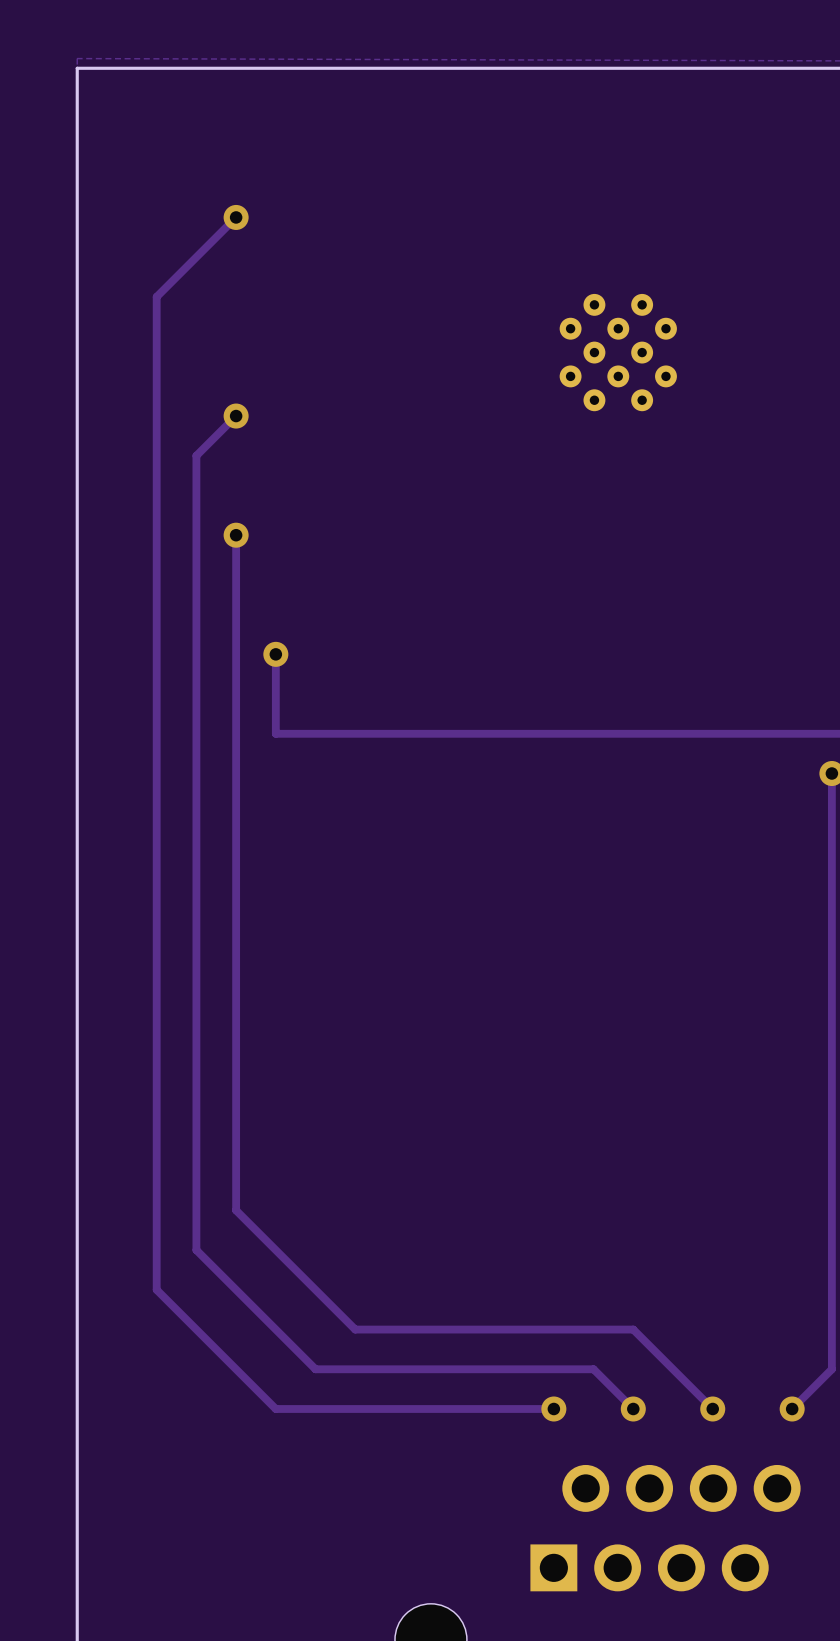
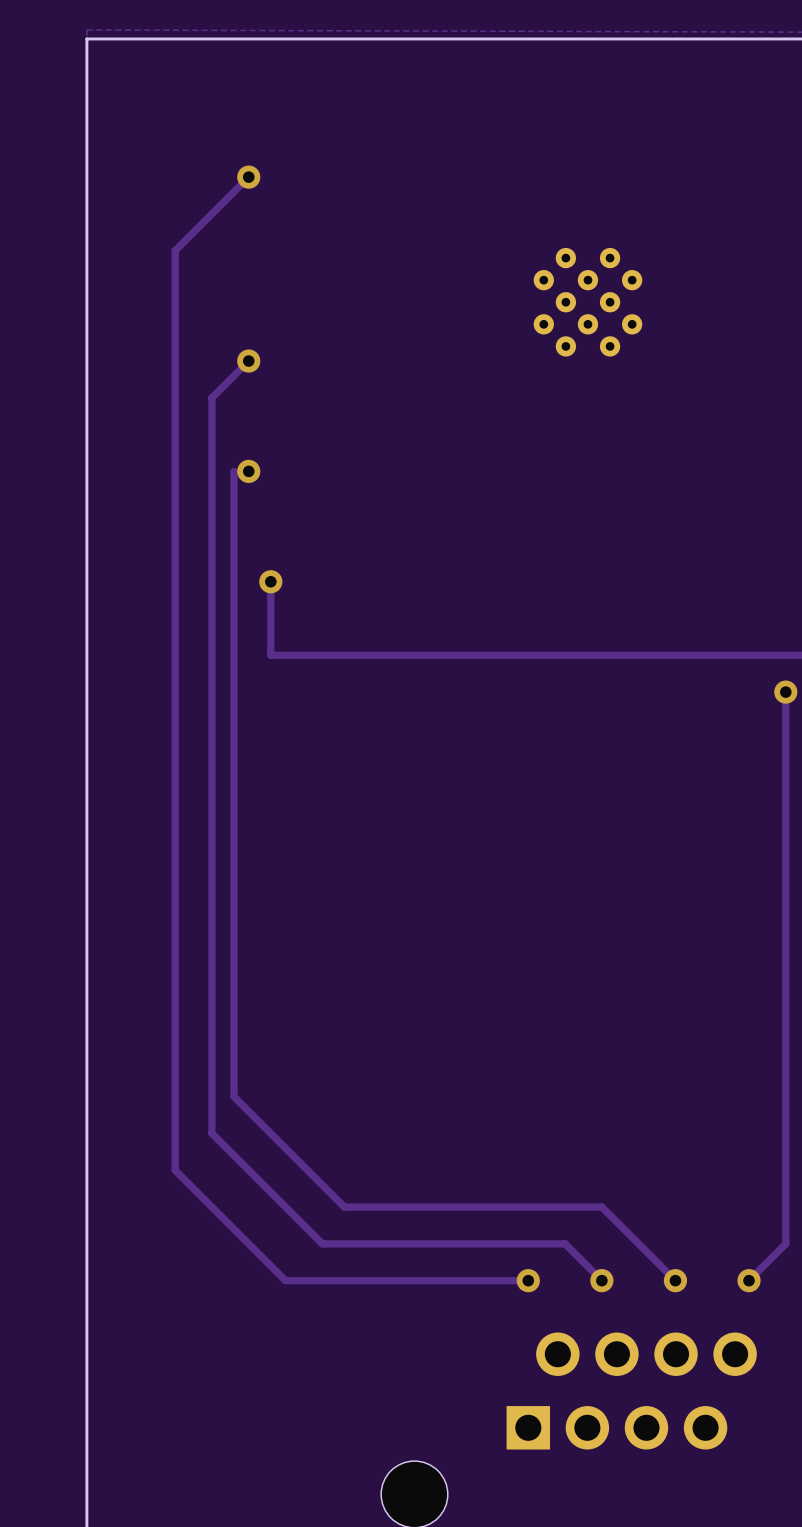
track: (236, 217) (156, 296) (156, 1289) (275, 1408) (291, 1408) -> (248, 177) (175, 250) (175, 1170) (285, 1280)
via position: (236, 217) -> (248, 177)
track: (236, 416) (196, 455) (196, 1250) (315, 1369) (331, 1369) -> (248, 361) (211, 397) (211, 1133) (322, 1243)
via position: (236, 416) -> (248, 361)
via position: (236, 535) -> (248, 471)

